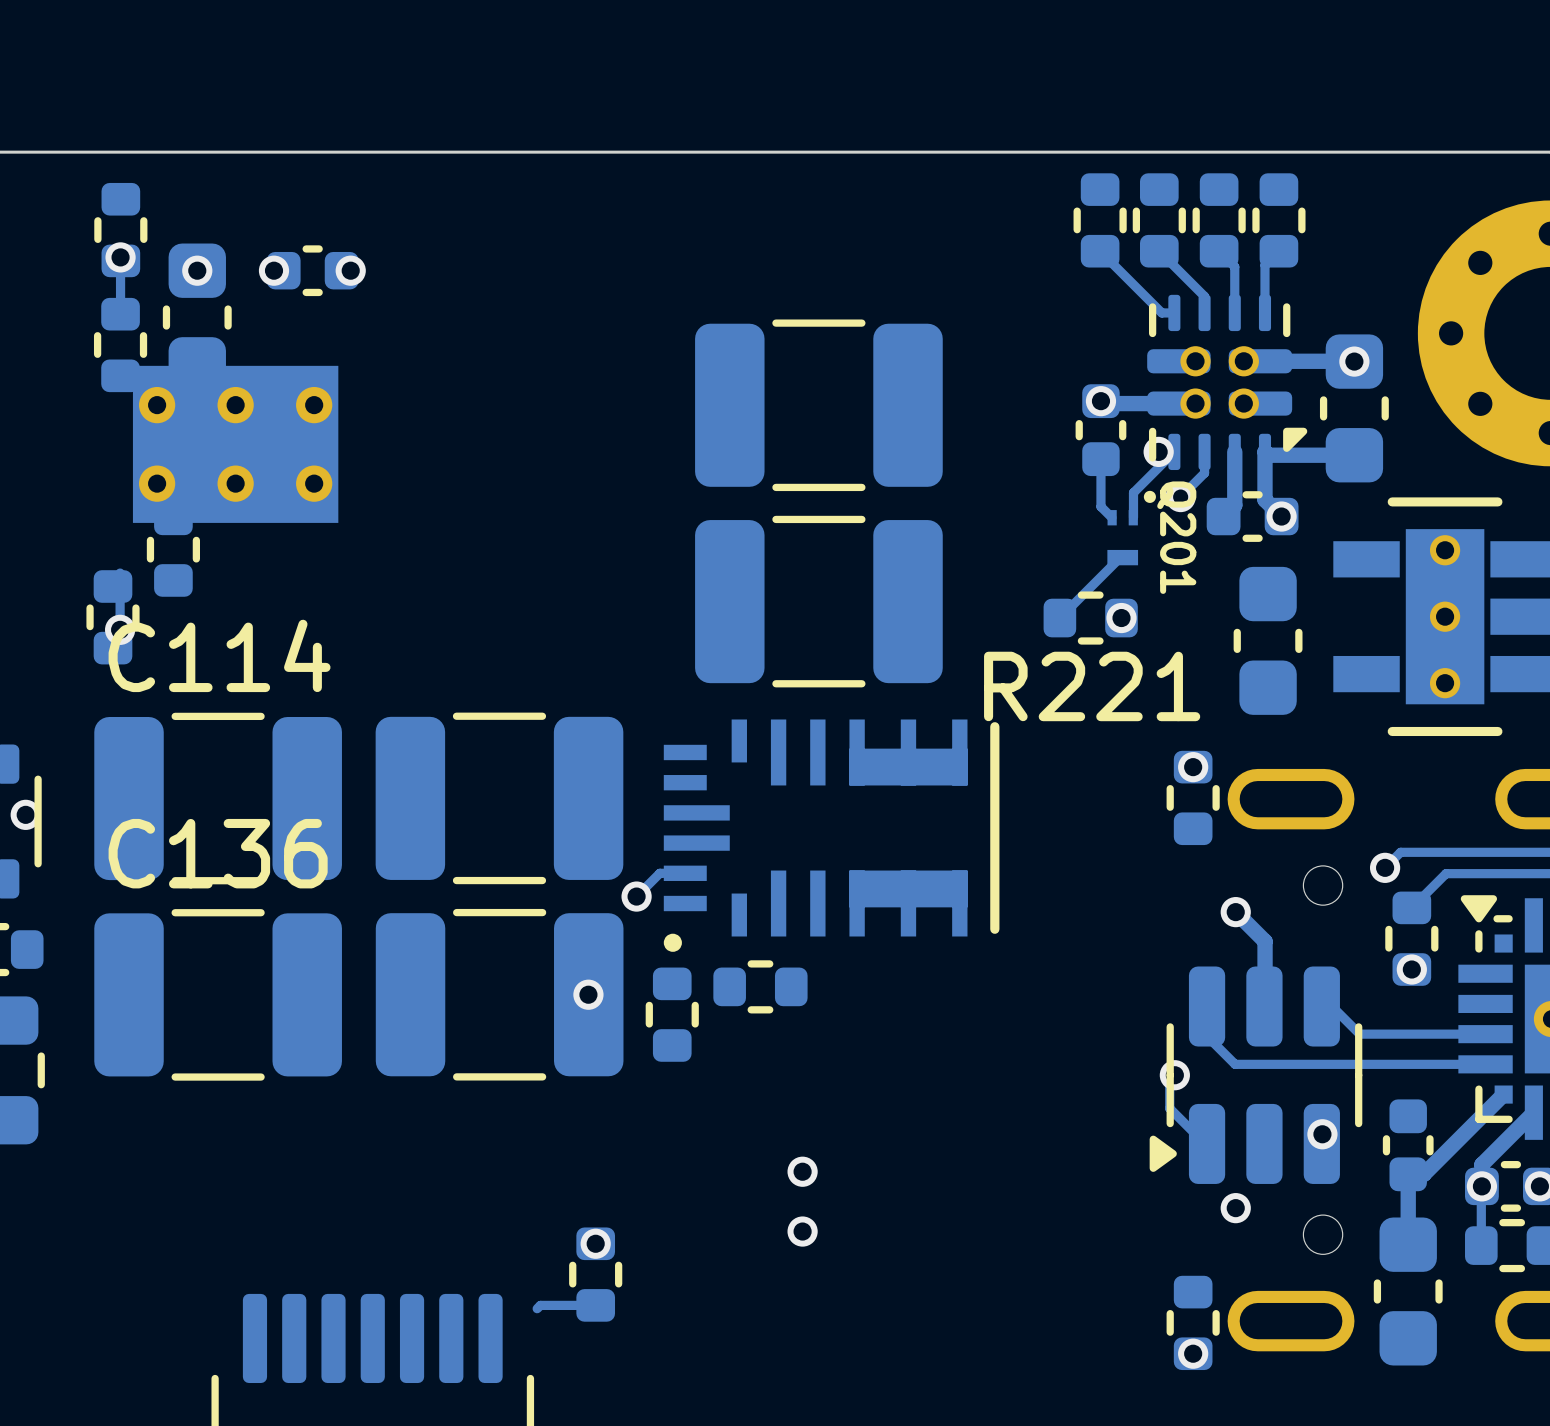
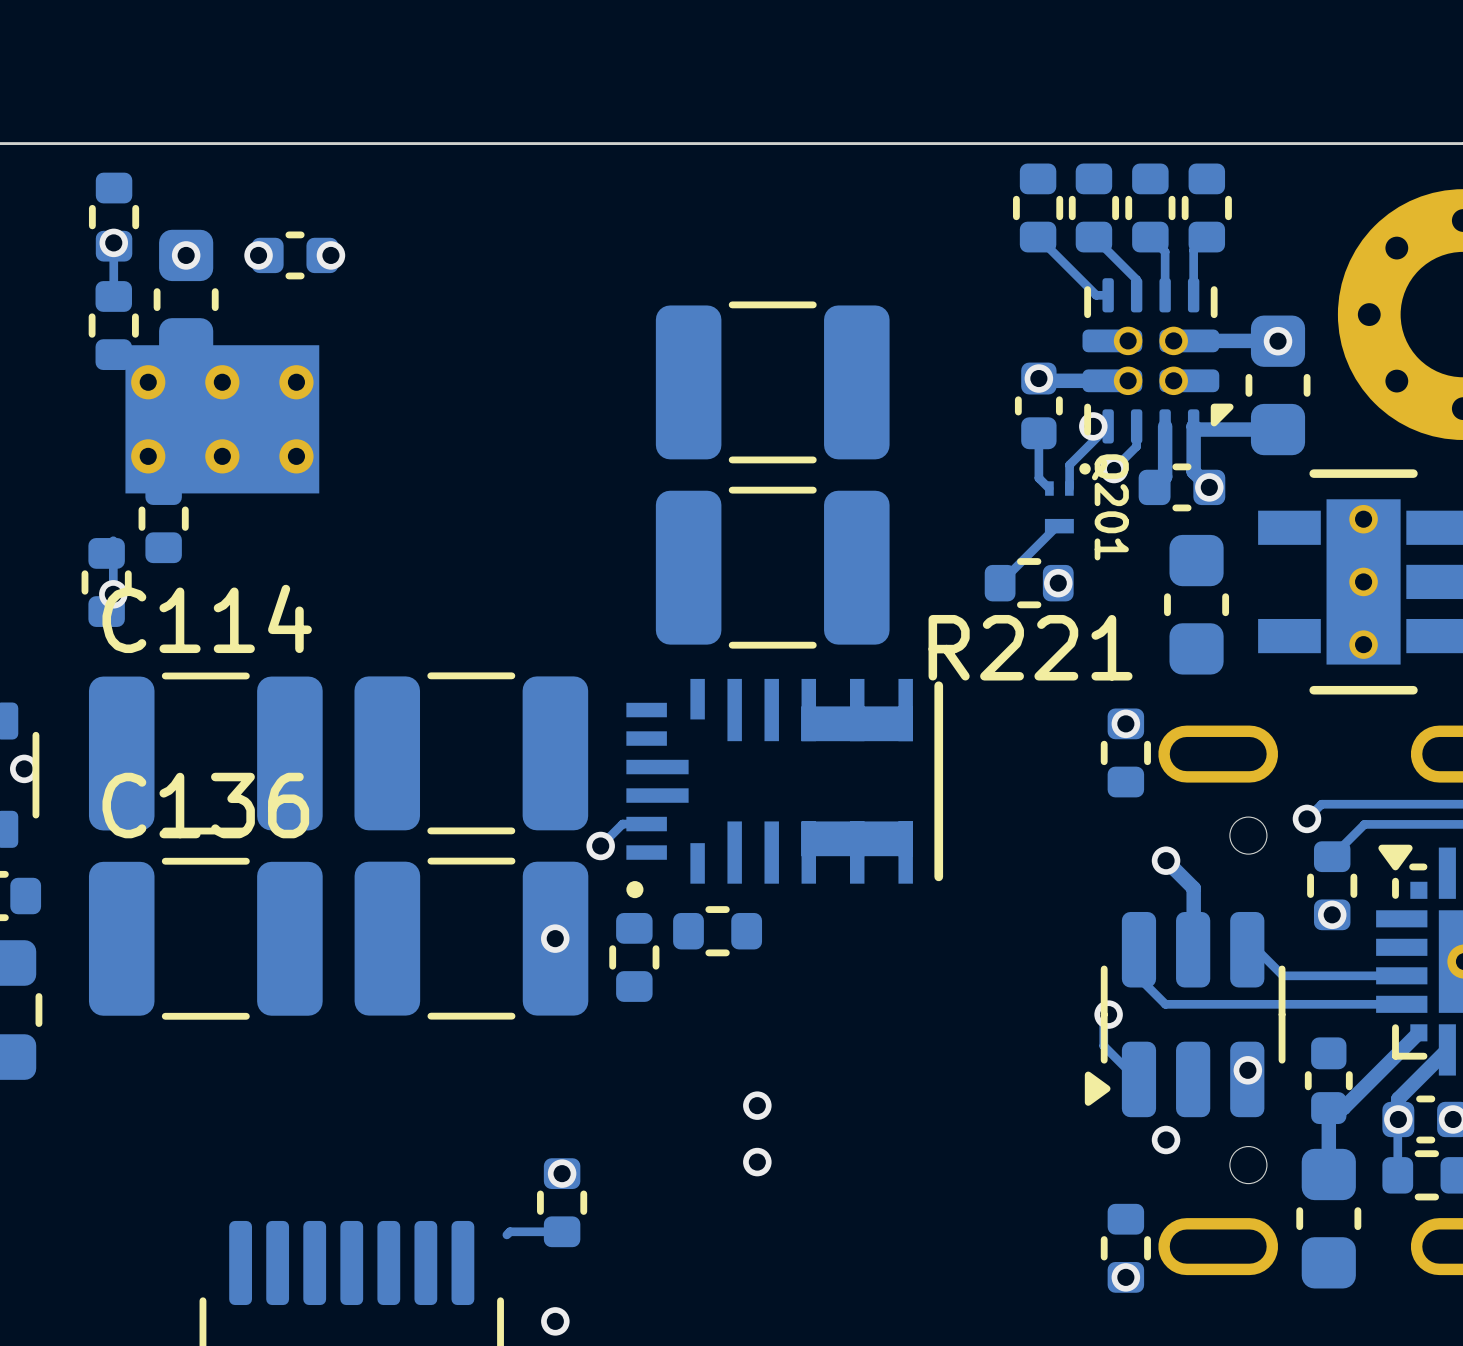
via: none -> (555, 1321)

